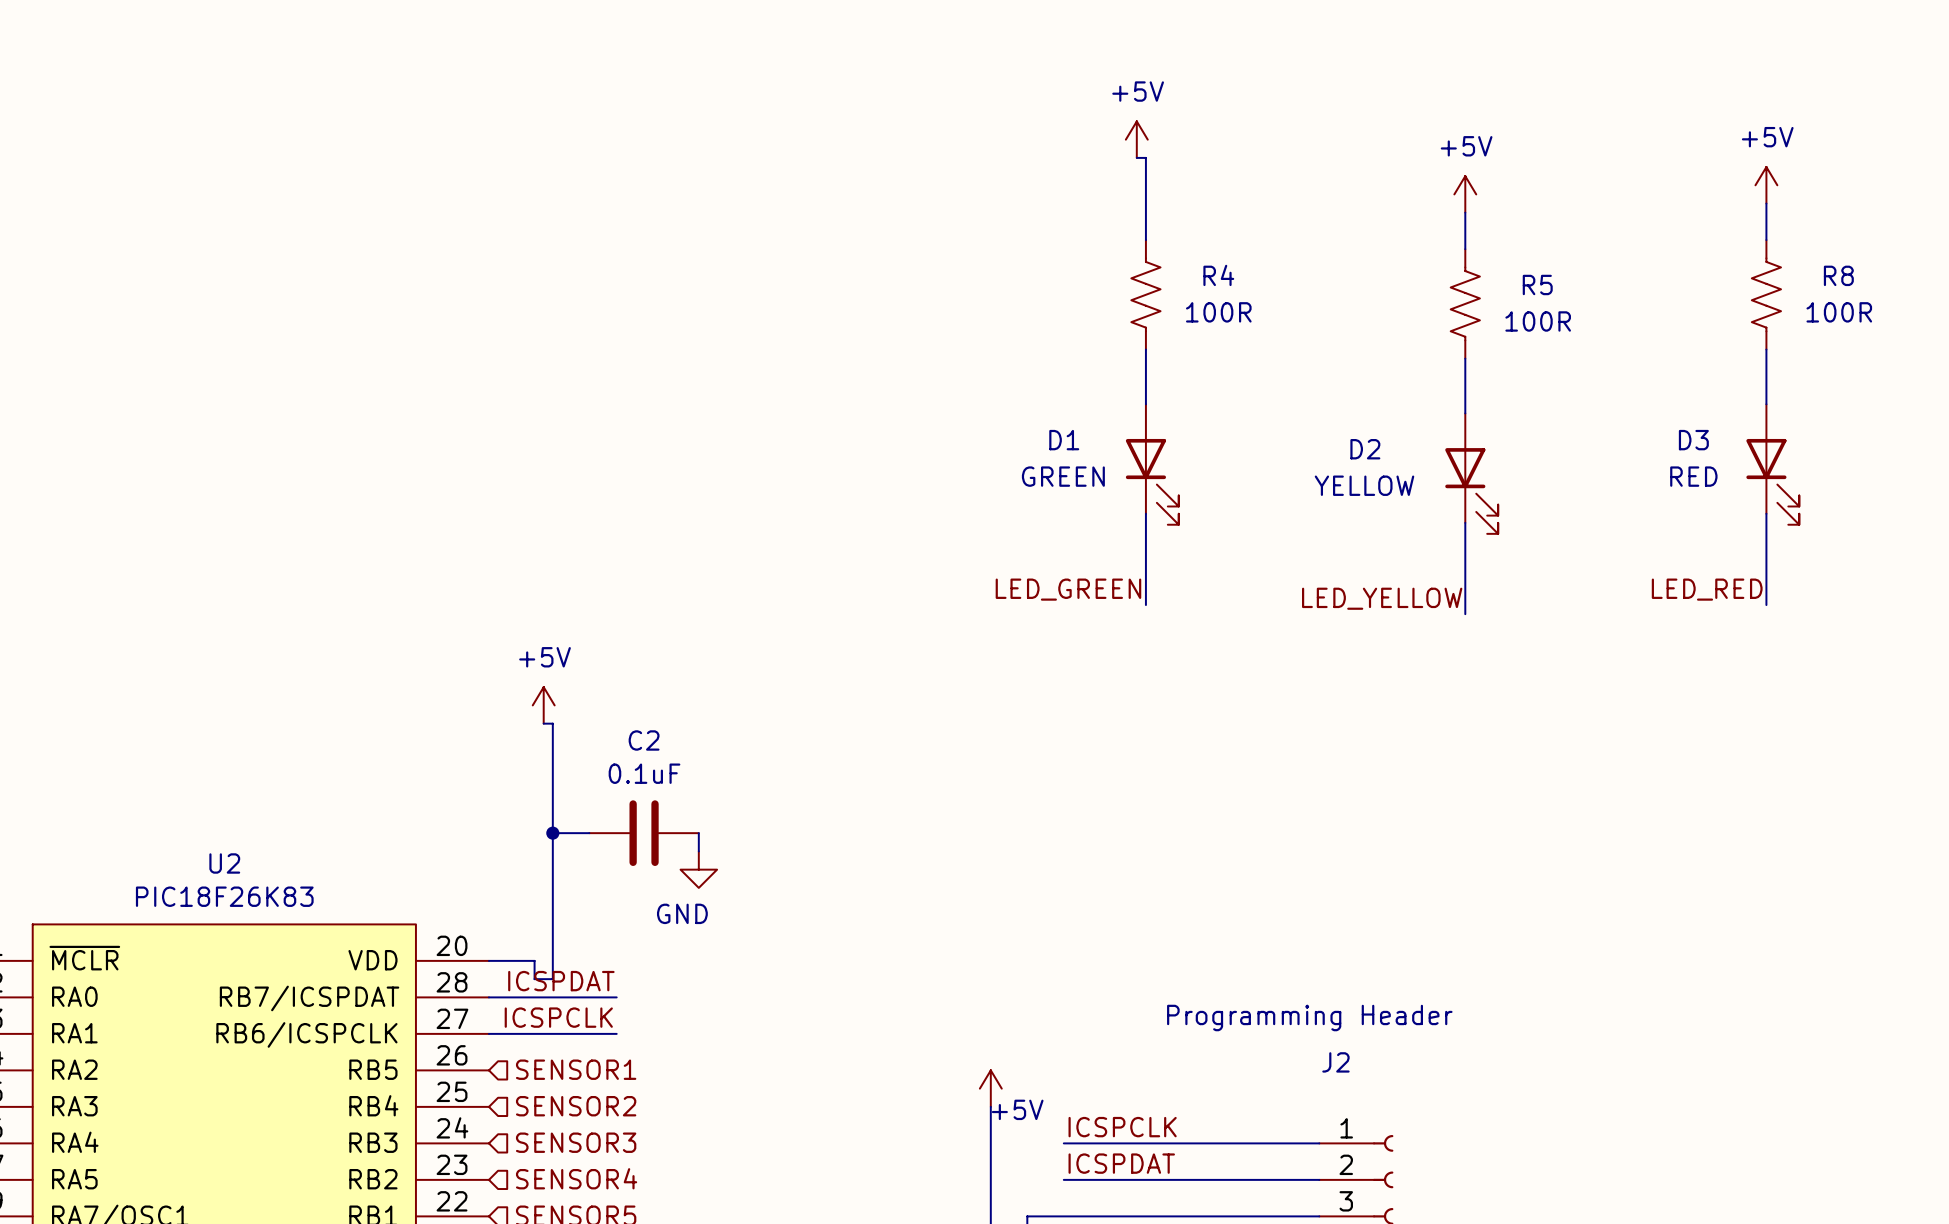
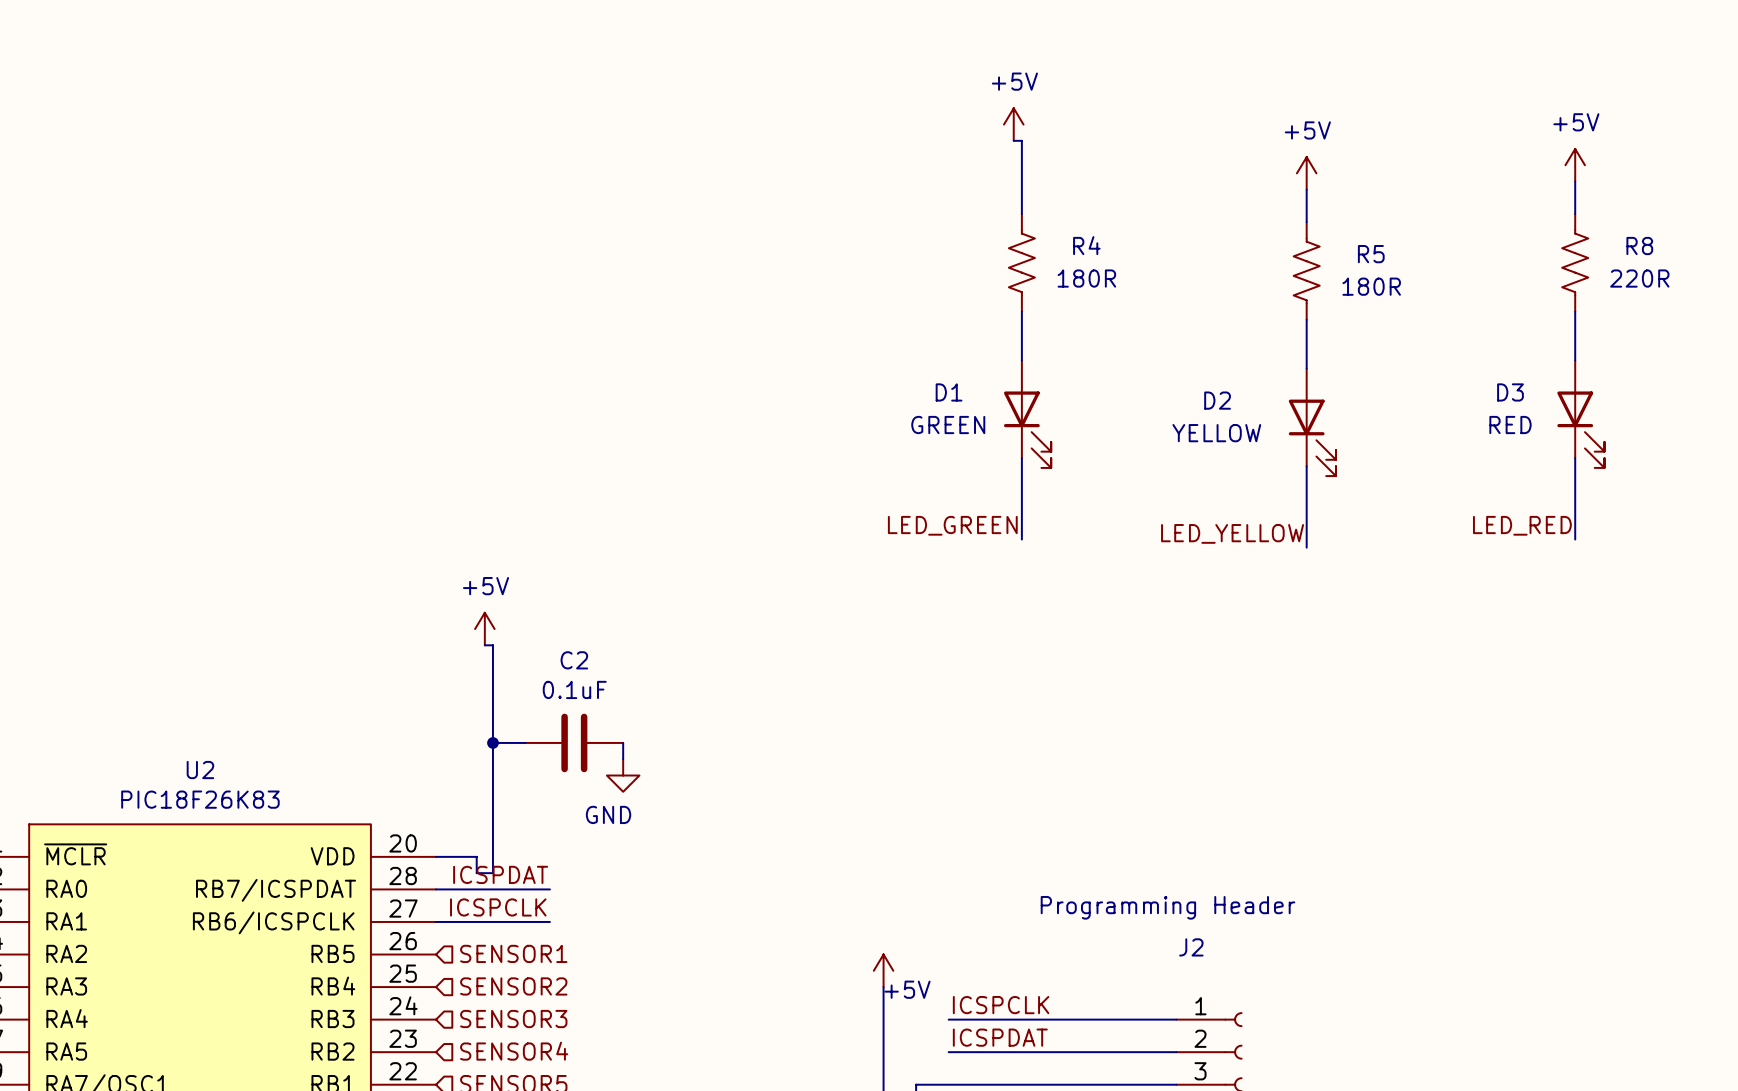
R4 value: 100R (1218, 312) -> 180R (1086, 278)
R8 value: 100R (1839, 312) -> 220R (1639, 278)
R5 value: 100R (1538, 321) -> 180R (1371, 286)

